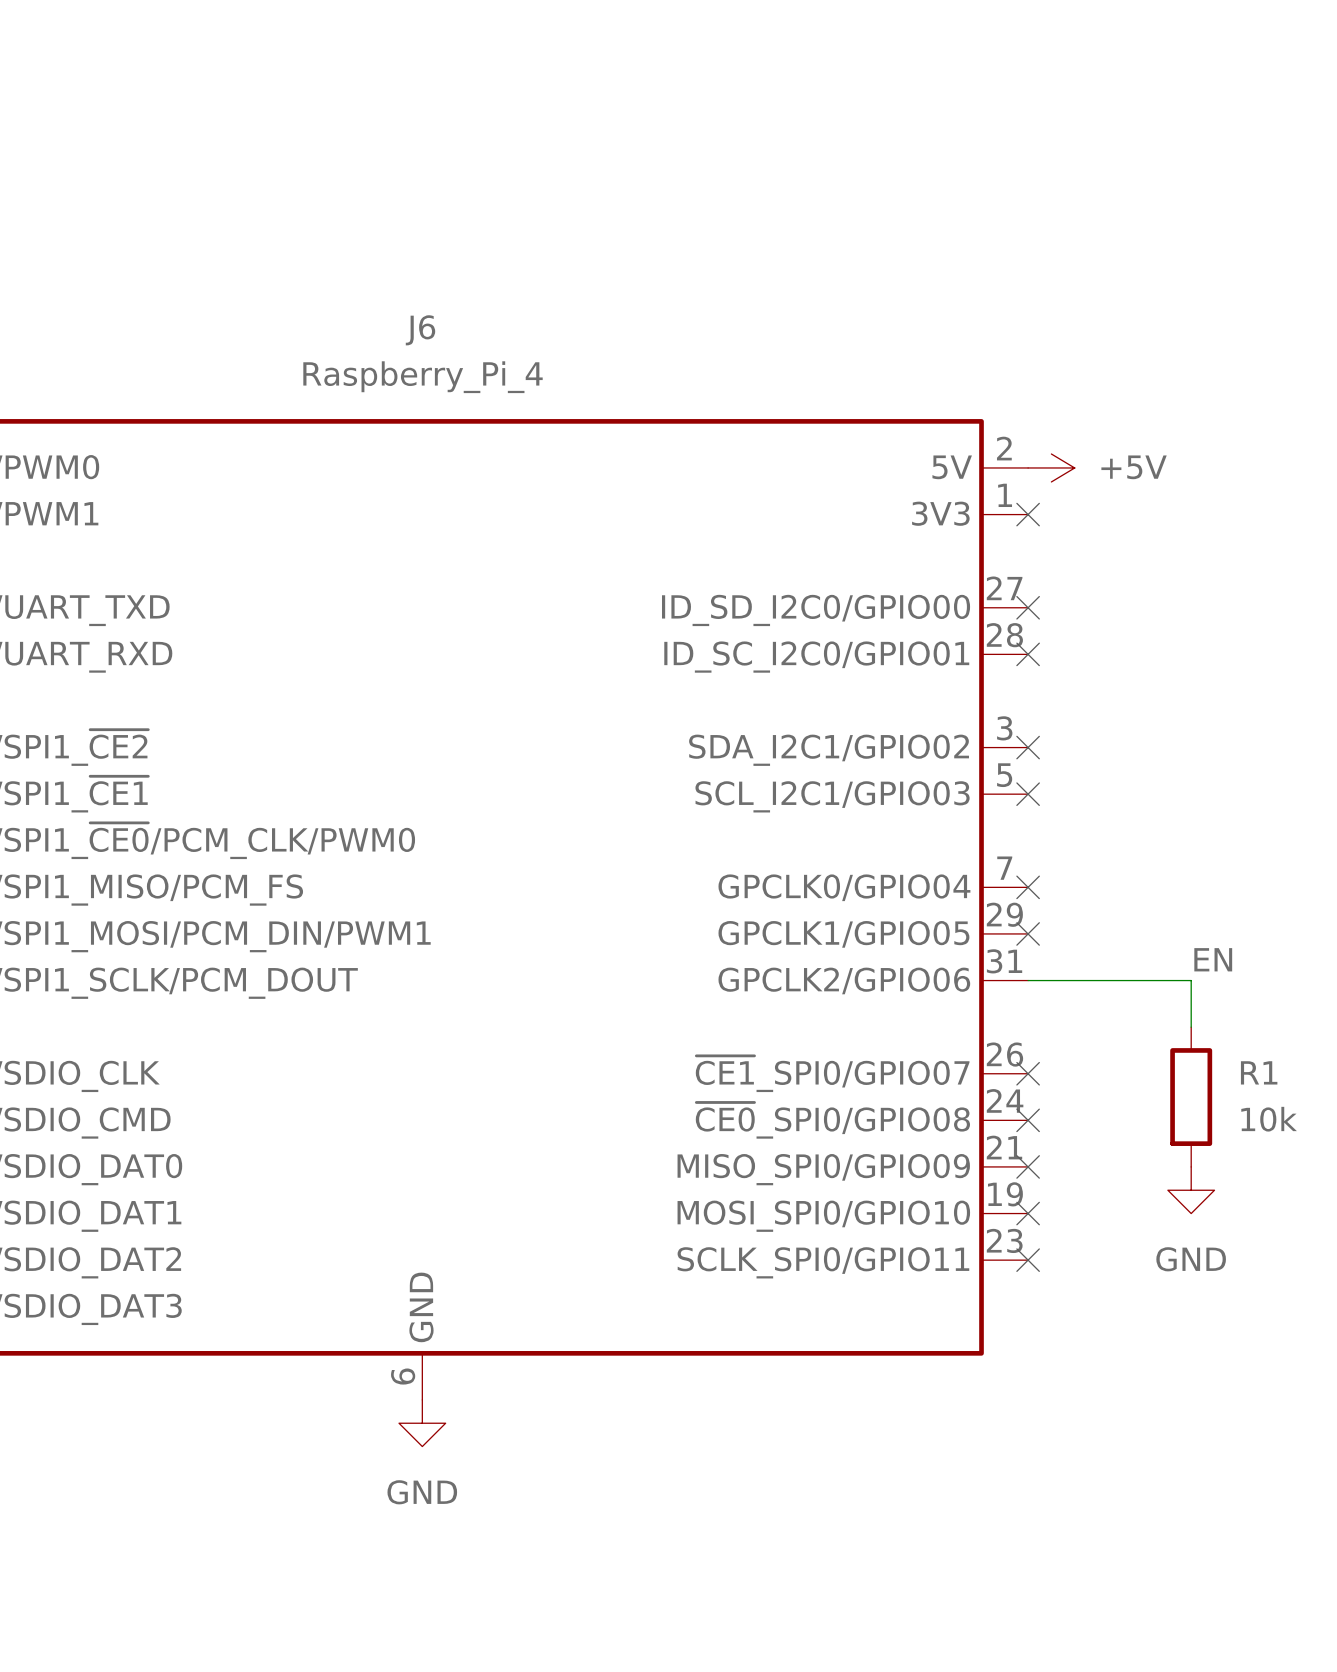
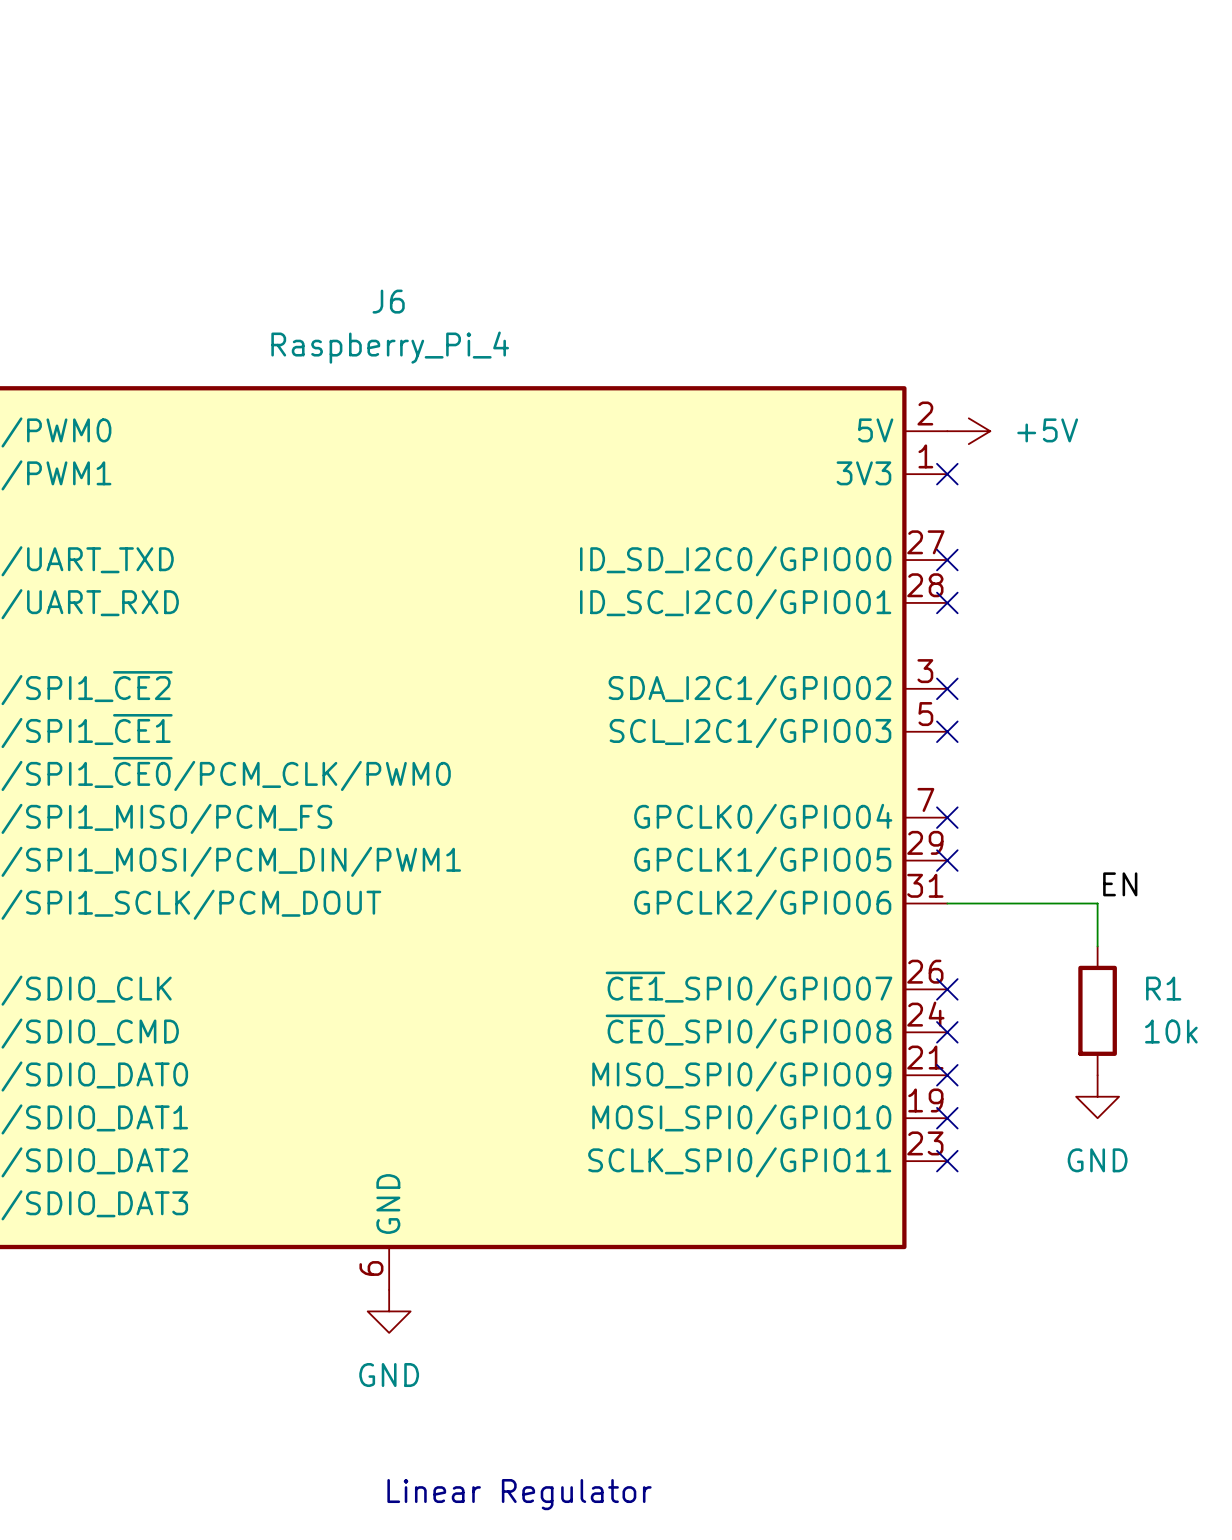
text: none -> Linear Regulator (519, 1494)

